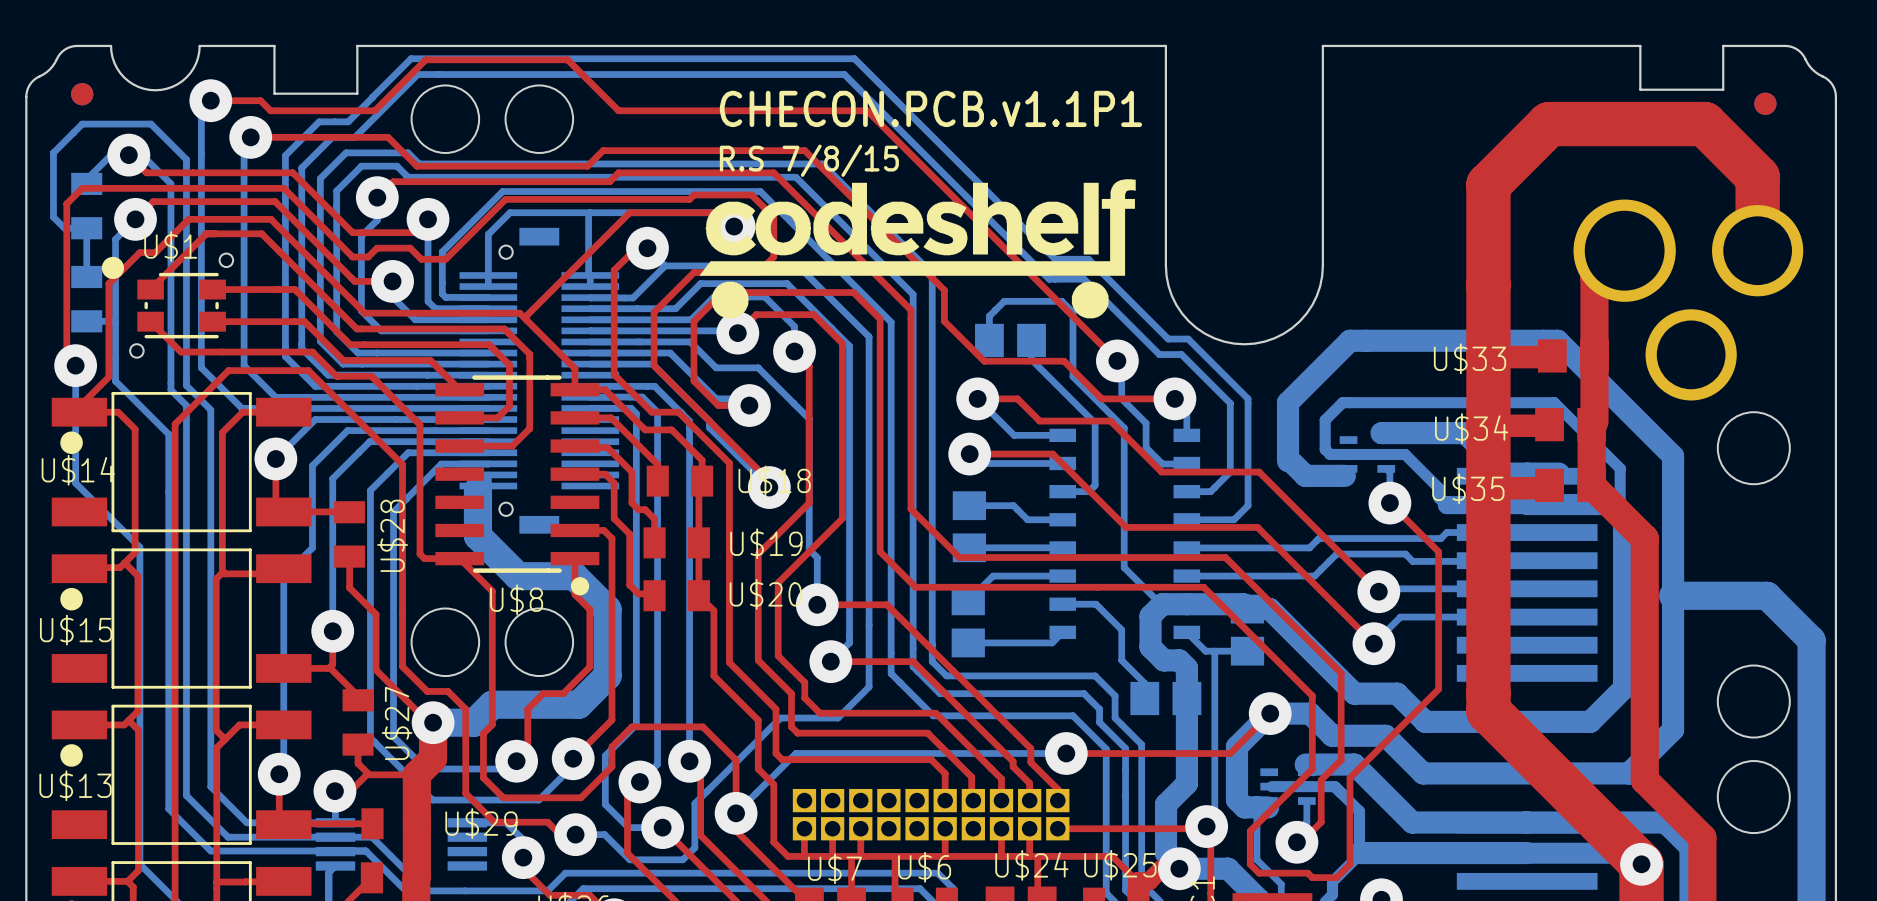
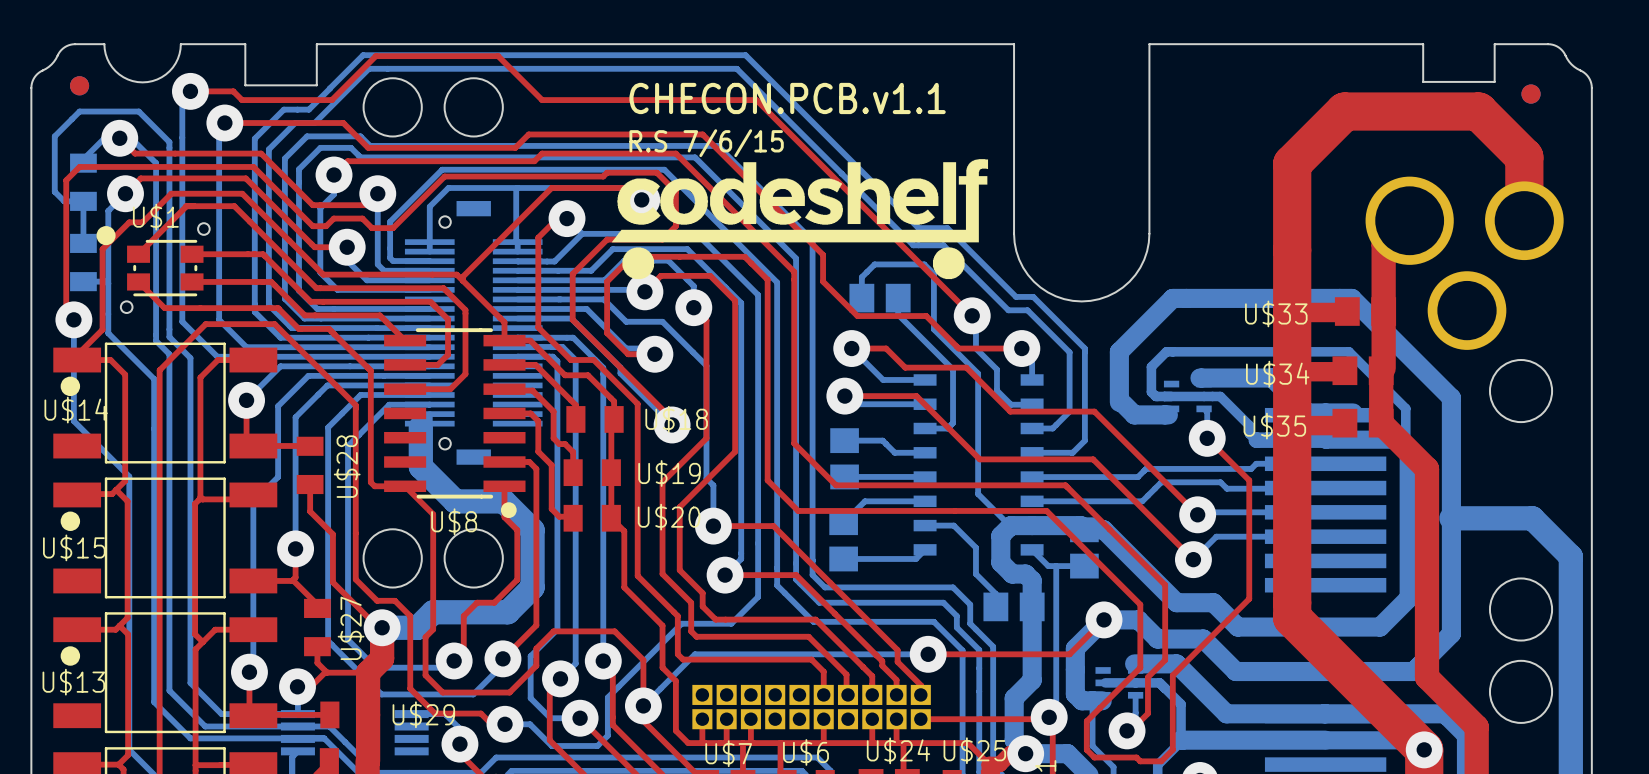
text: CHECON.PCB.v1.1P1 (930, 108) -> CHECON.PCB.v1.1 (787, 98)
text: R.S 7/8/15 (809, 160) -> R.S 7/6/15 (706, 143)

